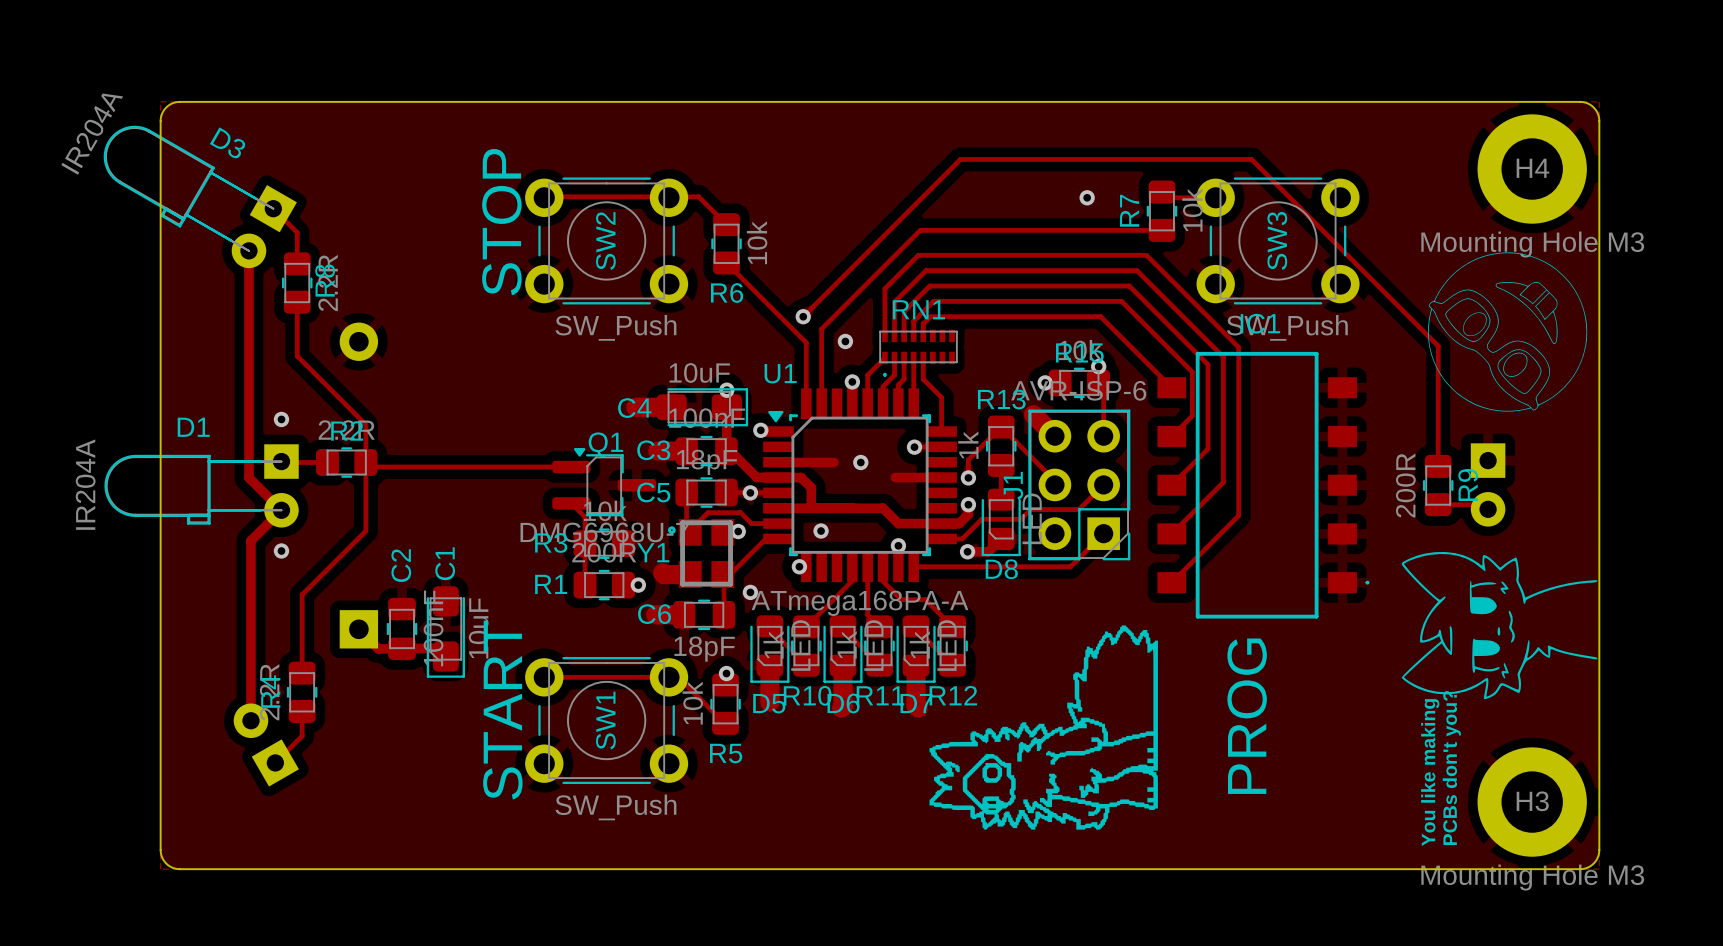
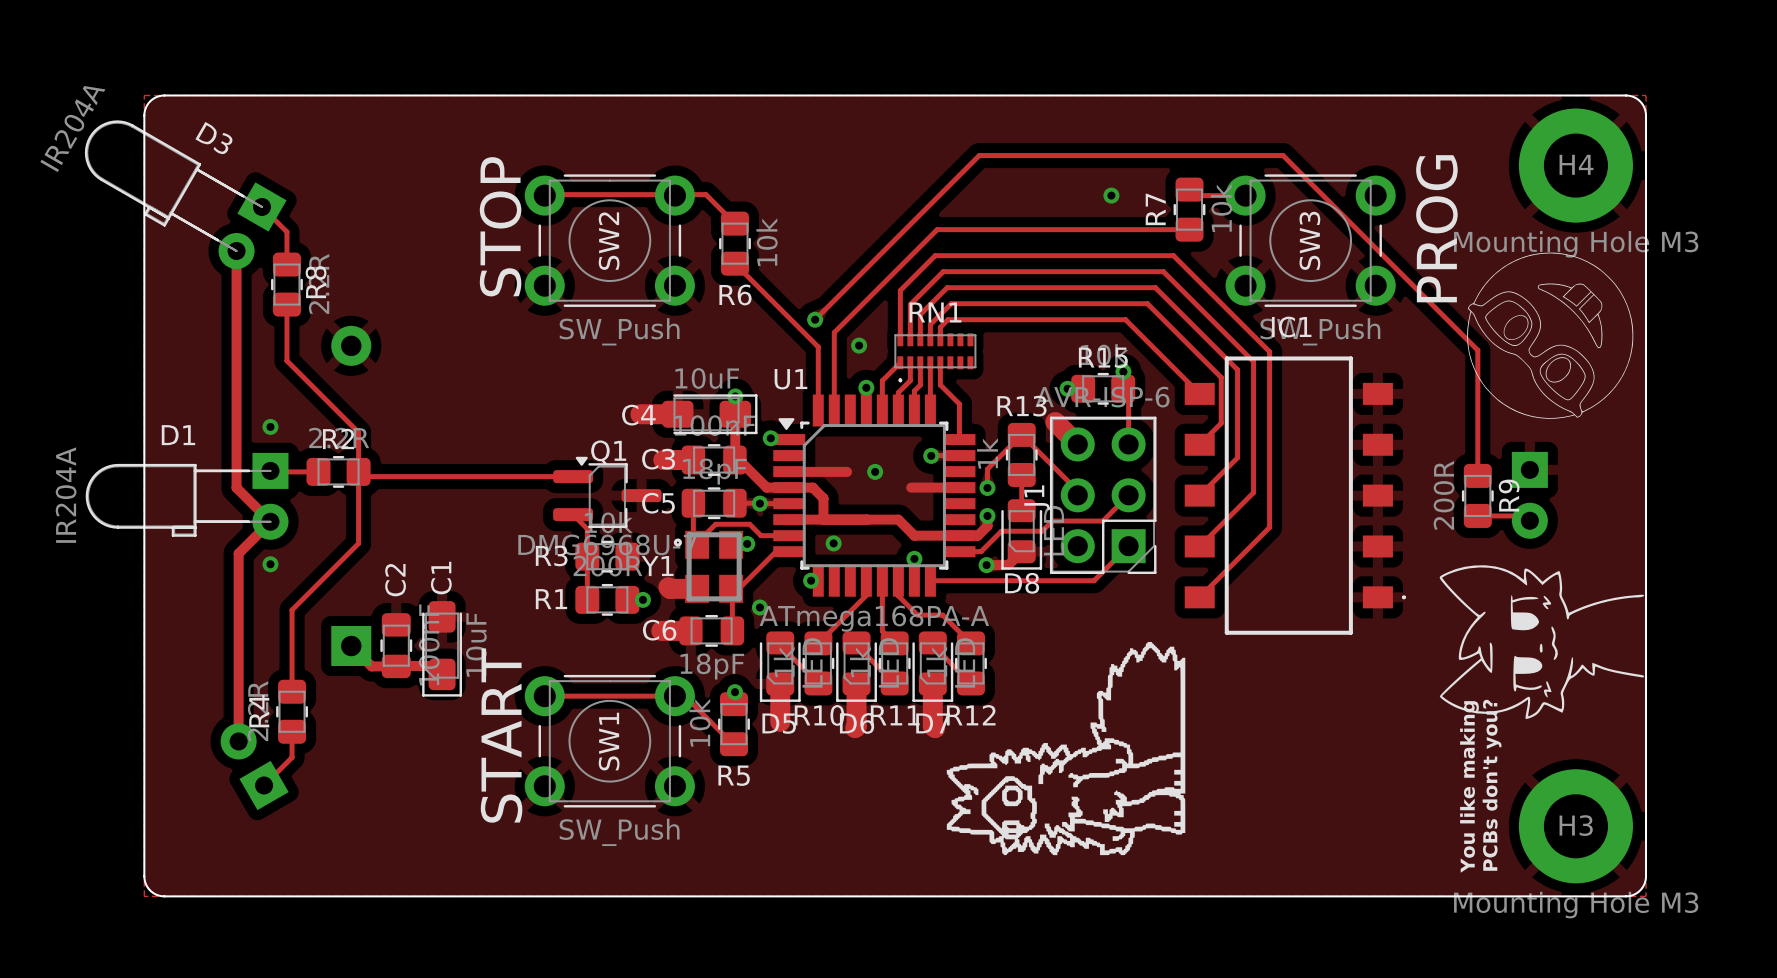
text: none -> PROG (1436, 228)
text: PROG (1247, 716) -> none

